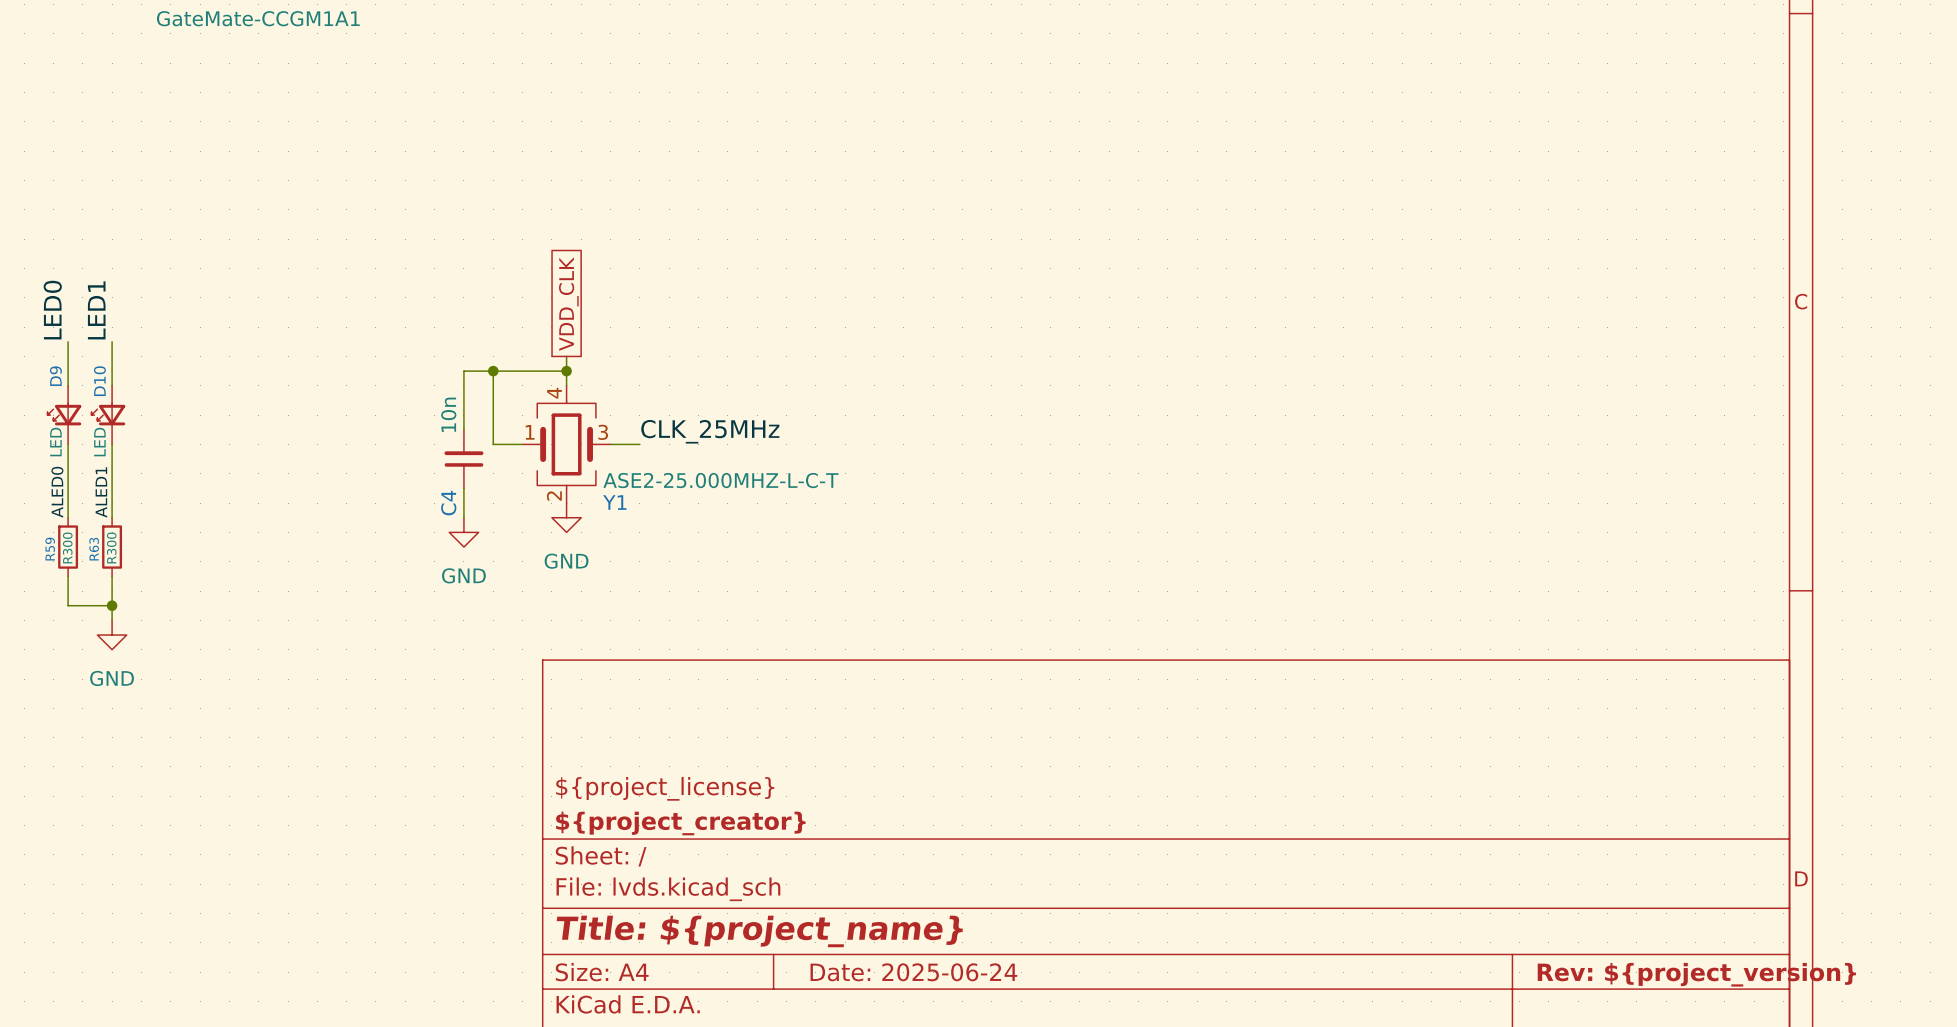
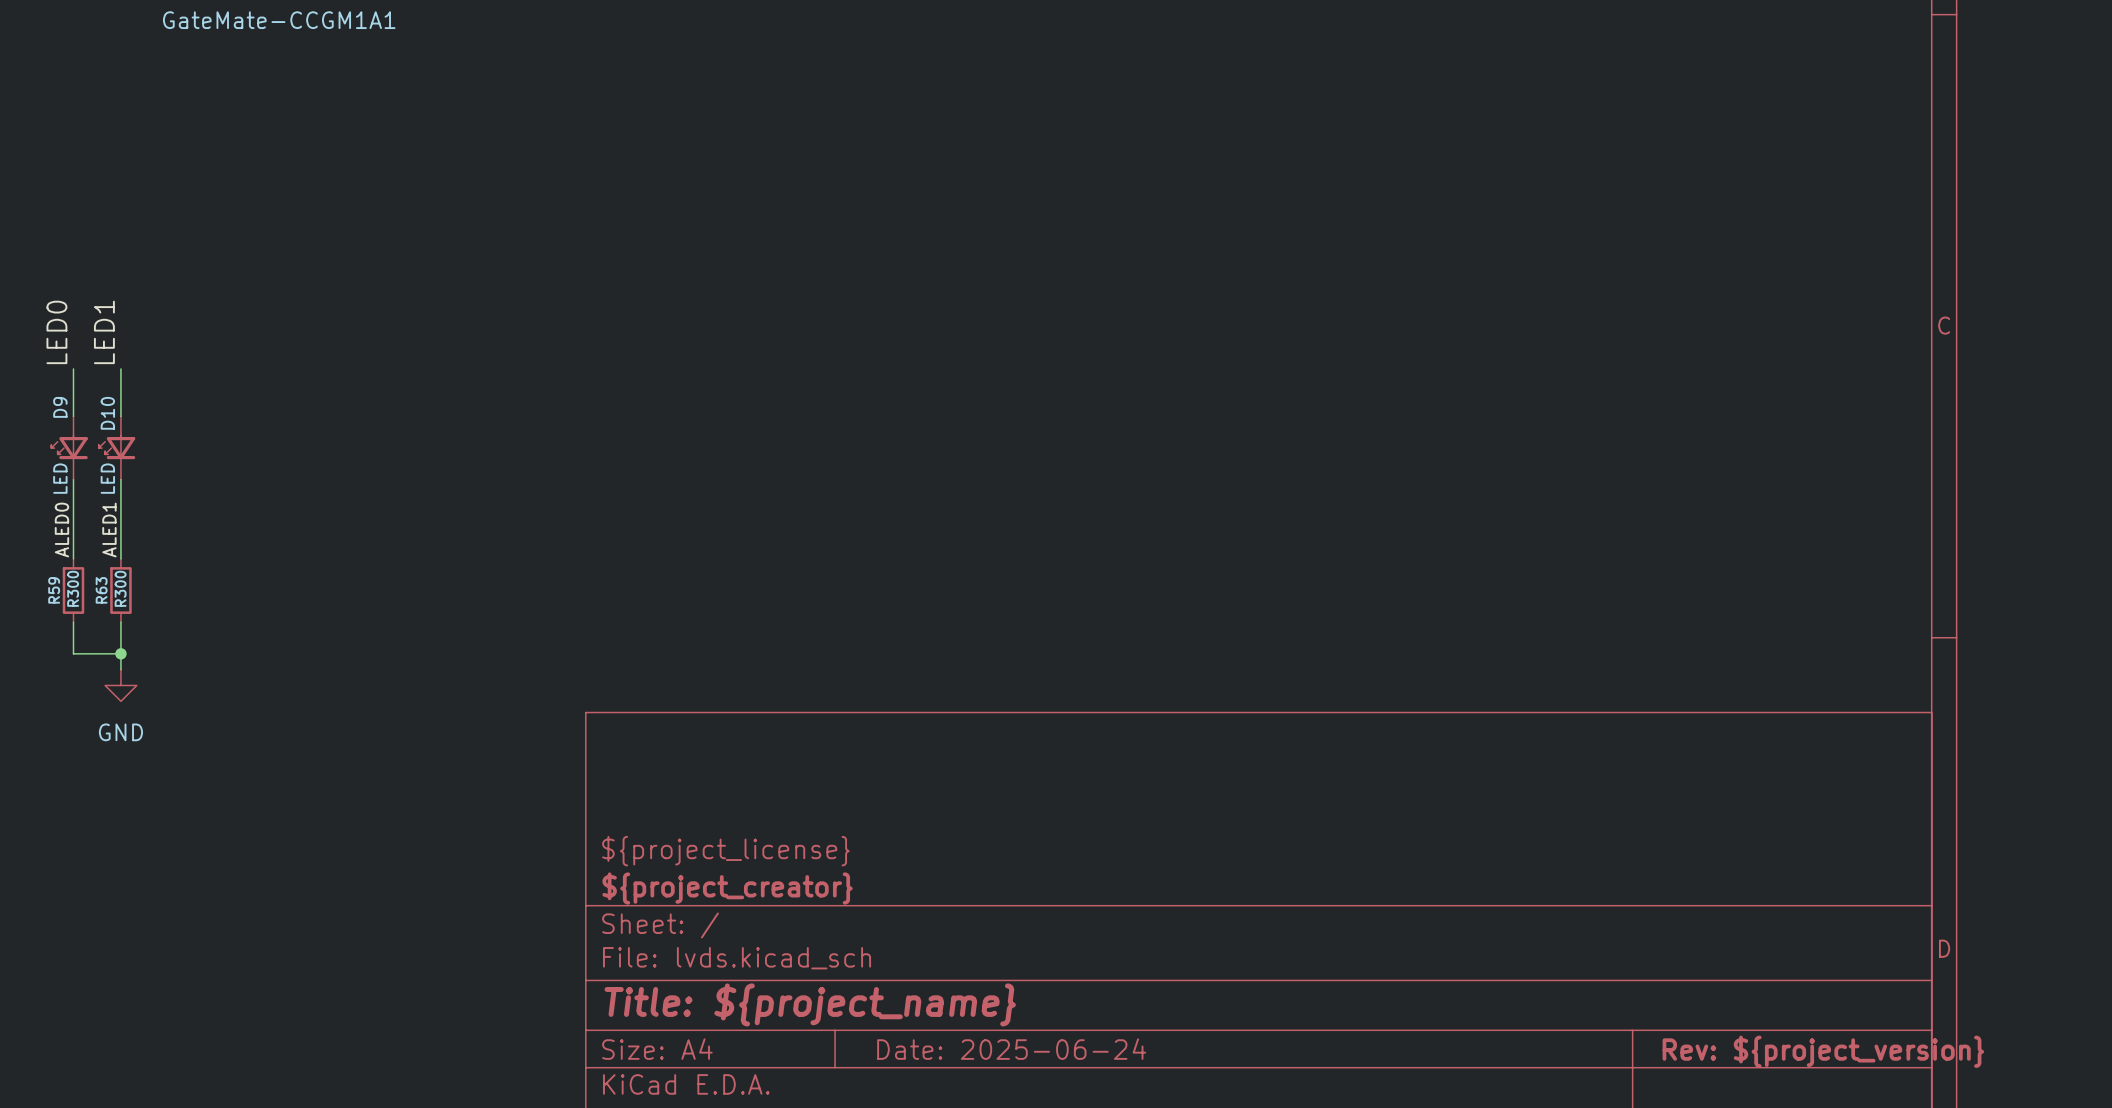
global label: VDD_CLK (568, 304) -> none
wire: (566, 356) (566, 385) -> none
wire: (493, 371) (493, 444) (522, 444) -> none
junction: (493, 371) -> none
wire: (566, 371) (463, 371) (463, 429) -> none
junction: (566, 371) -> none
label: CLK_25MHz (710, 431) -> none
Y1: ASE2-25.000MHZ-L-C-T (566, 444) -> none
wire: (610, 444) (639, 444) -> none
C4: 10n (463, 459) -> none
wire: (463, 488) (463, 517) -> none
power symbol: GND (566, 517) -> none
power symbol: GND (463, 532) -> none

